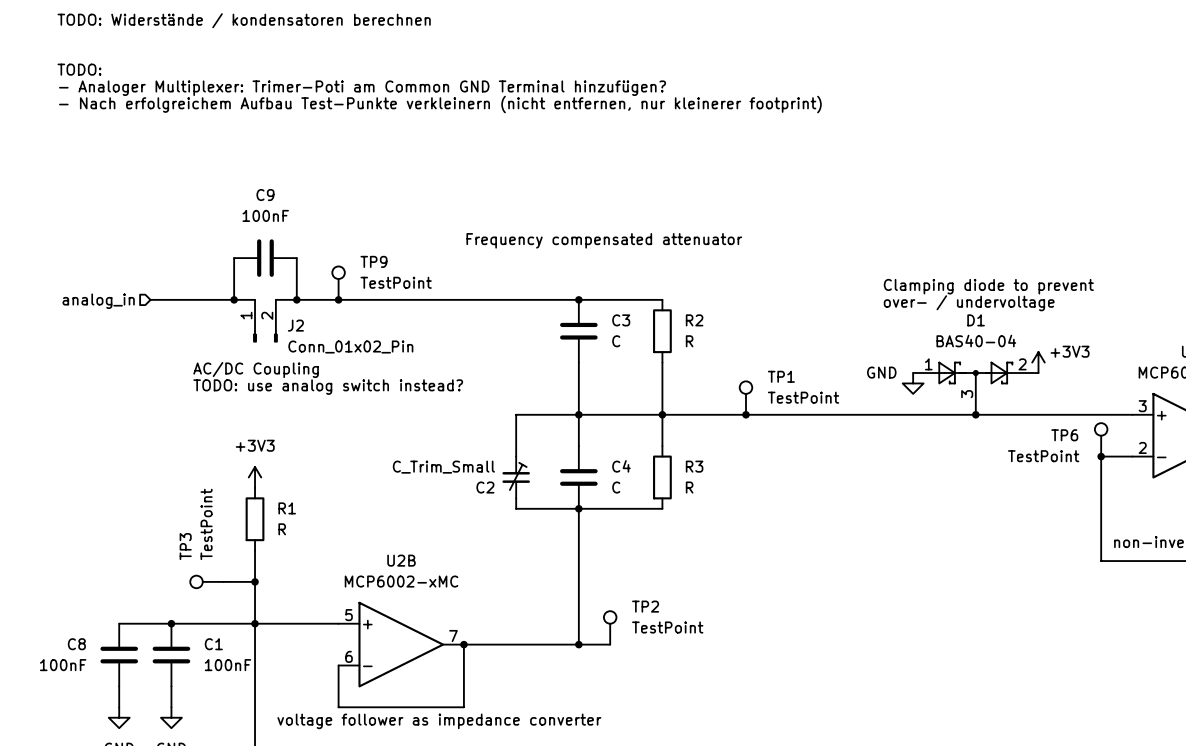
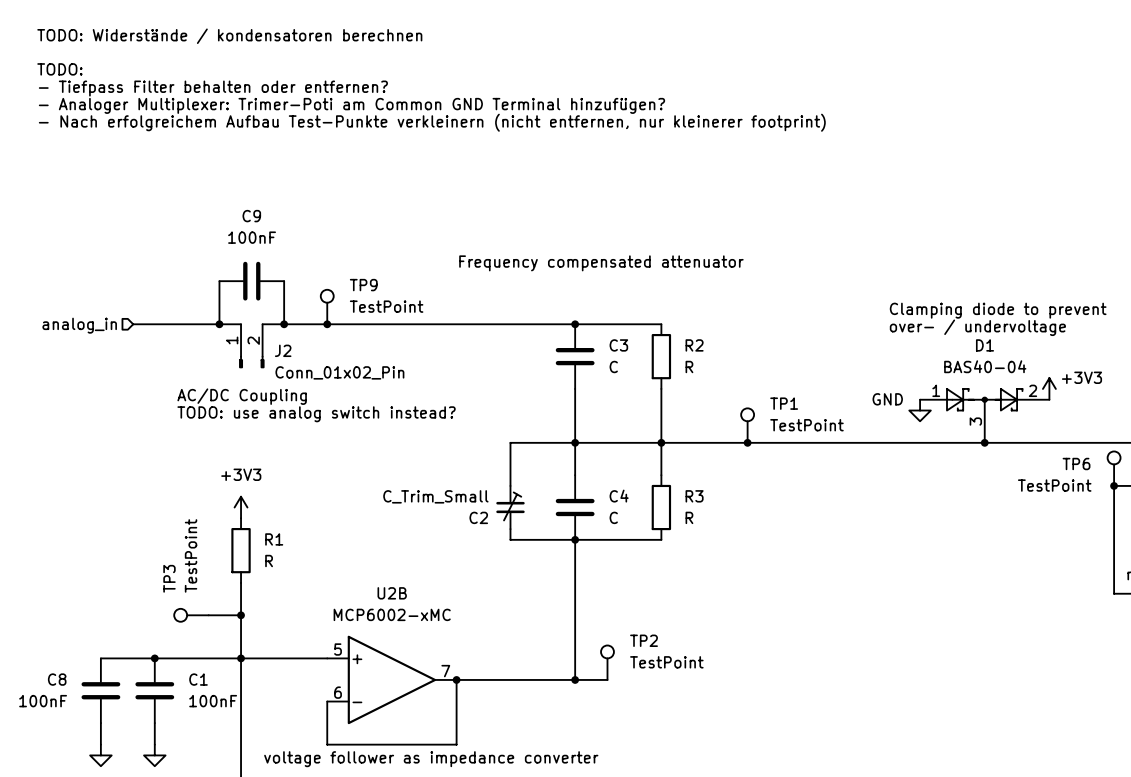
text: none -> TODO: (59, 69)
text: TODO: (79, 69) -> - Tiefpass Filter behalten oder entfernen? (213, 88)

